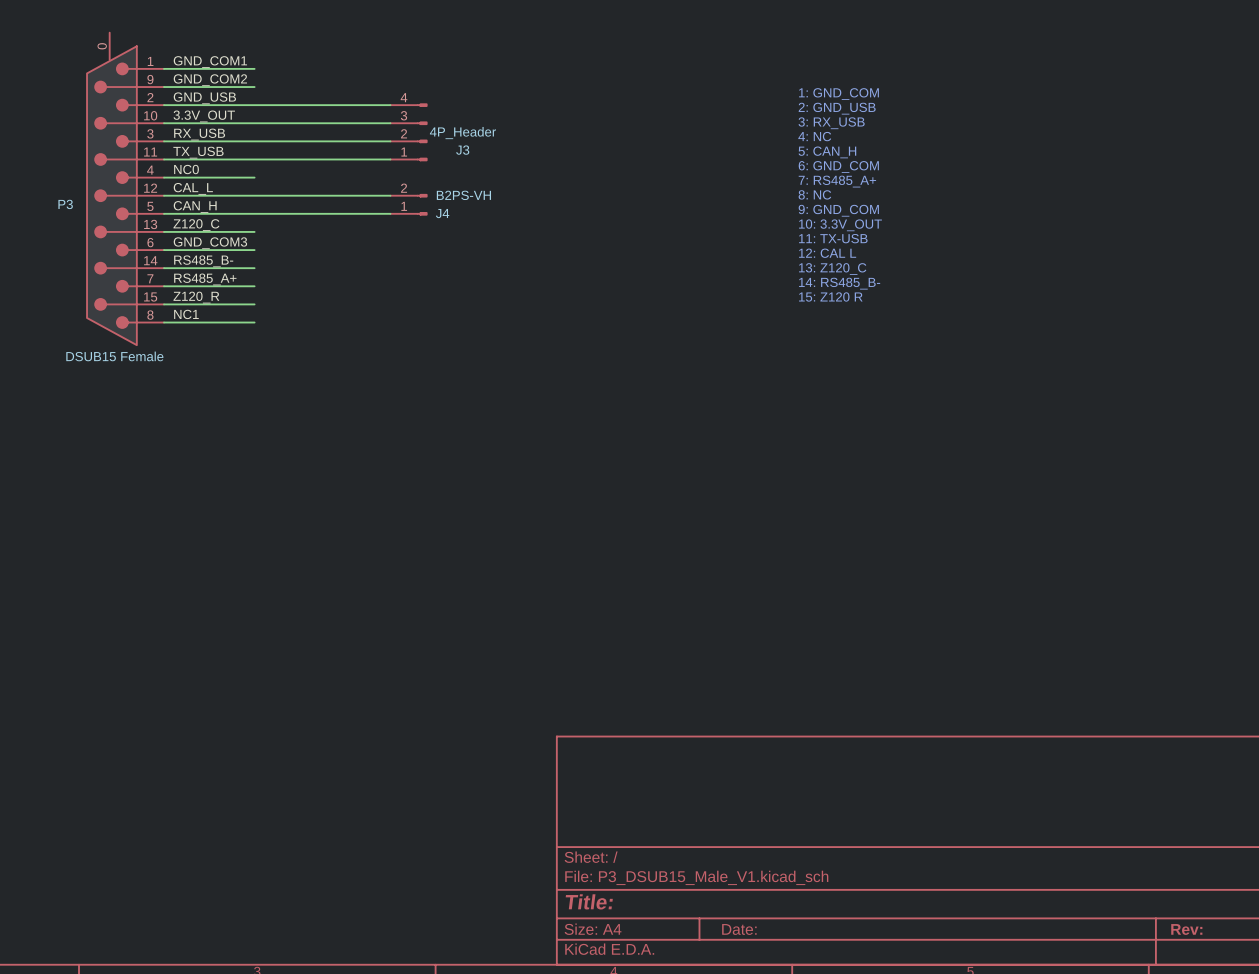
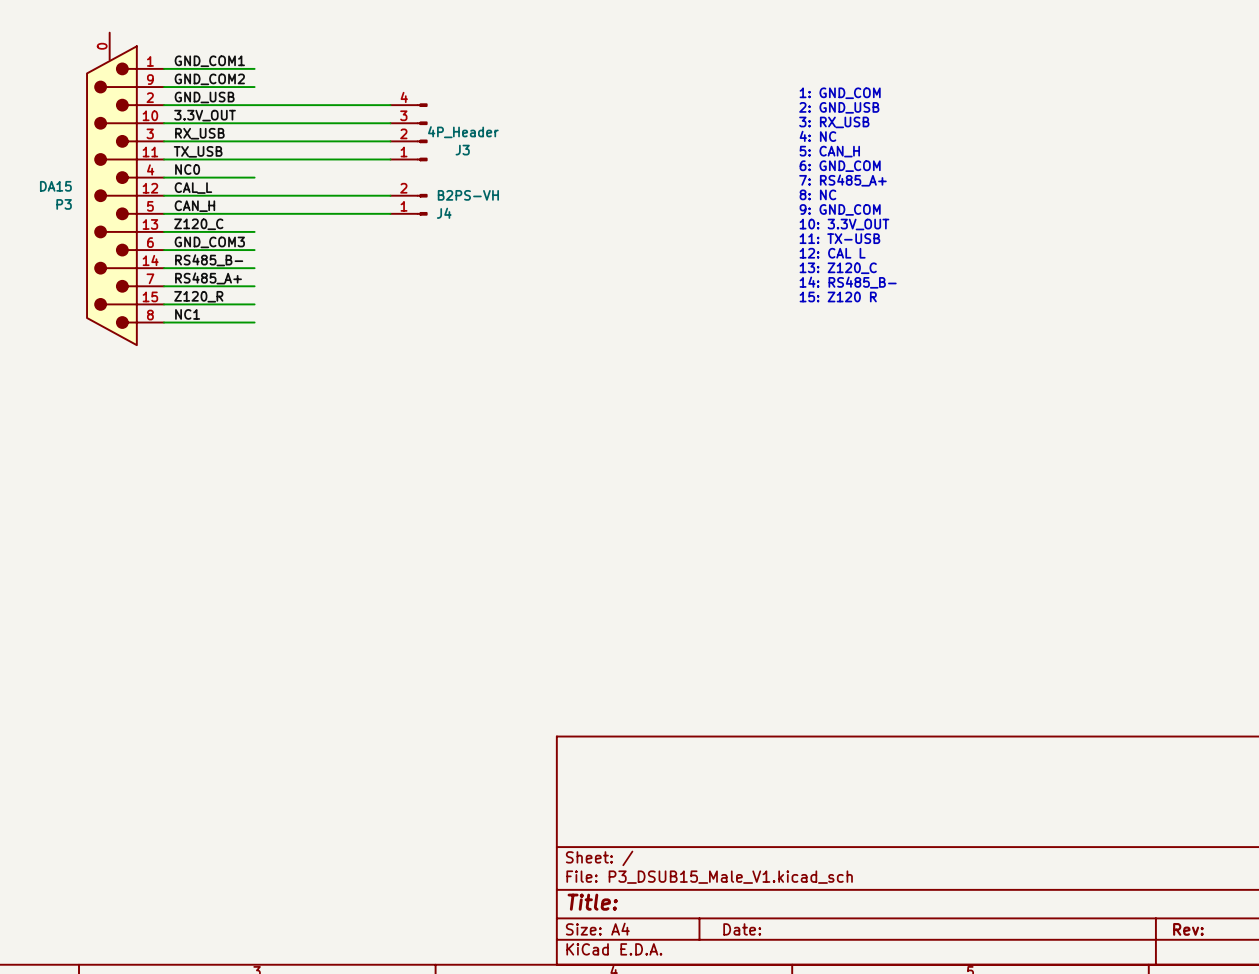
P3 value: DSUB15 Female (114, 356) -> DA15 (55, 186)

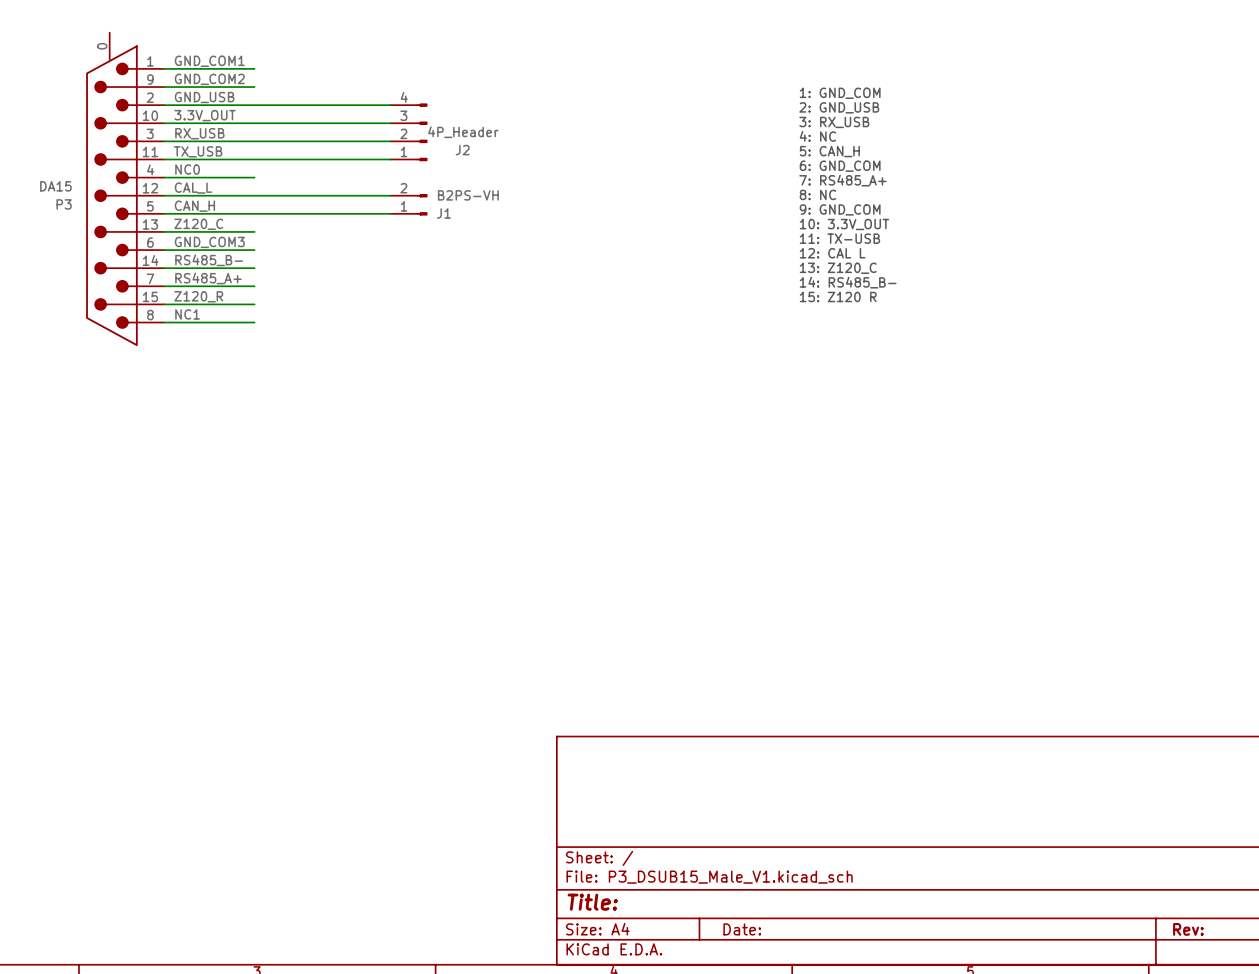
J3 name: J3 (462, 150) -> J2 (462, 150)
J4 name: J4 (444, 213) -> J1 (444, 213)

